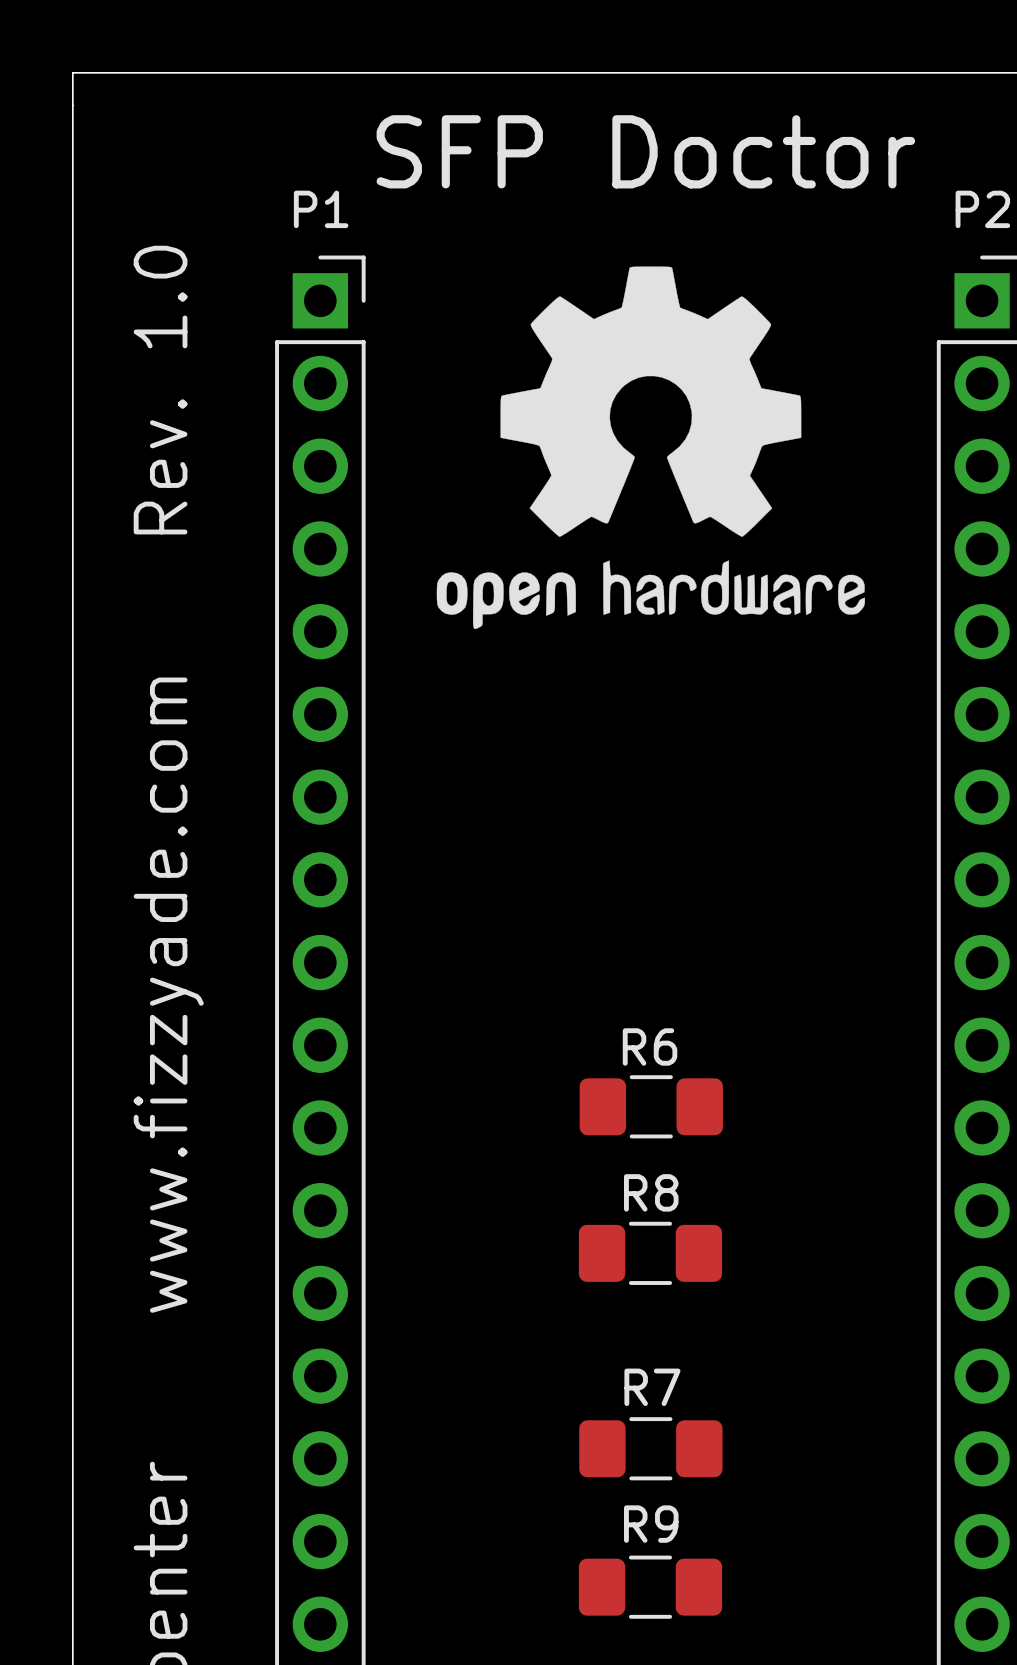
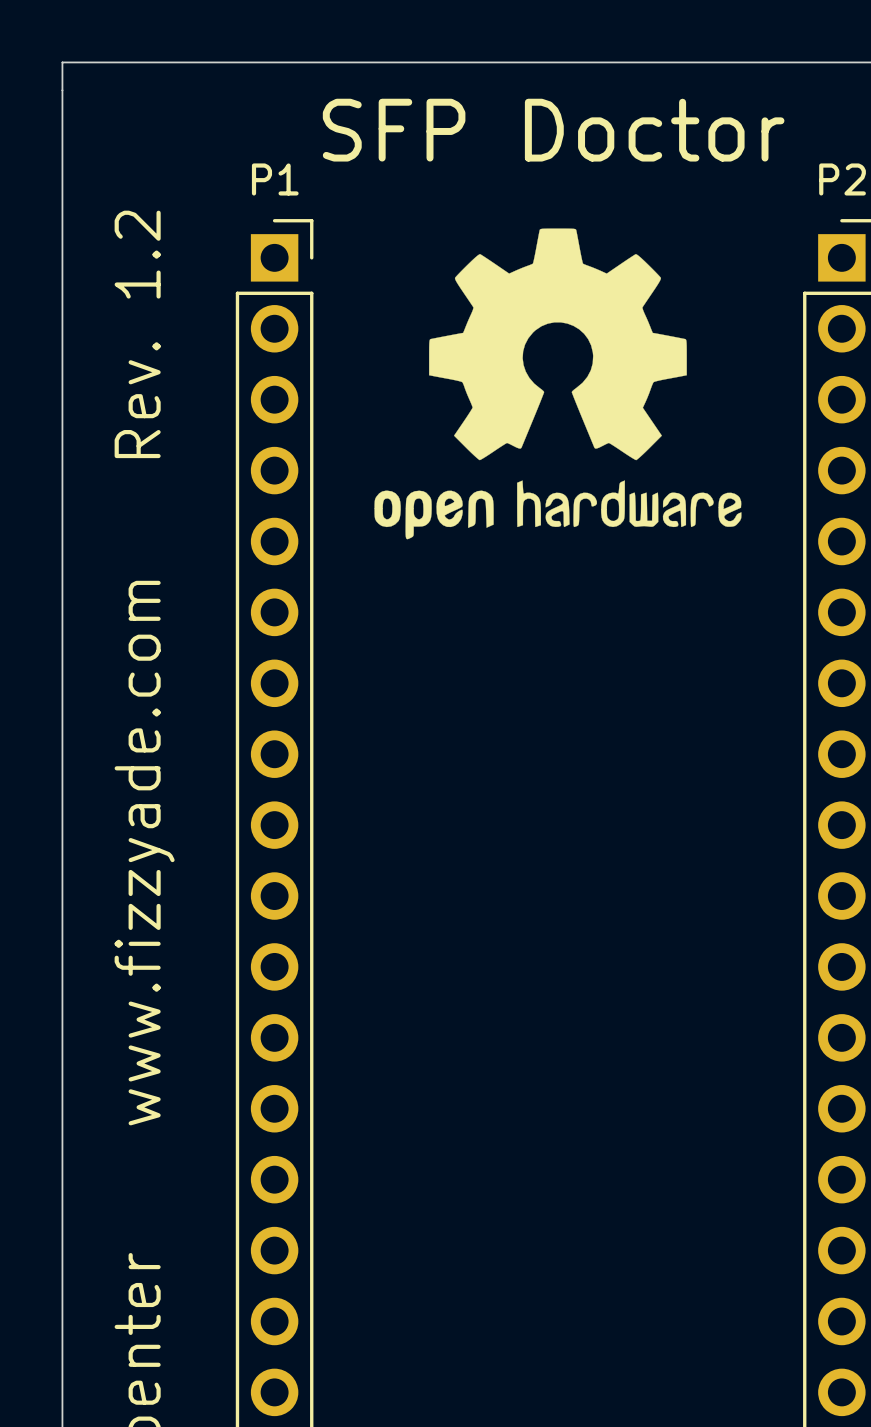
text: Rev. 1.0 (160, 390) -> Rev. 1.2 (137, 334)
R6: (651, 1106) -> none
R8: (650, 1253) -> none
R7: (650, 1448) -> none
R9: (650, 1587) -> none

